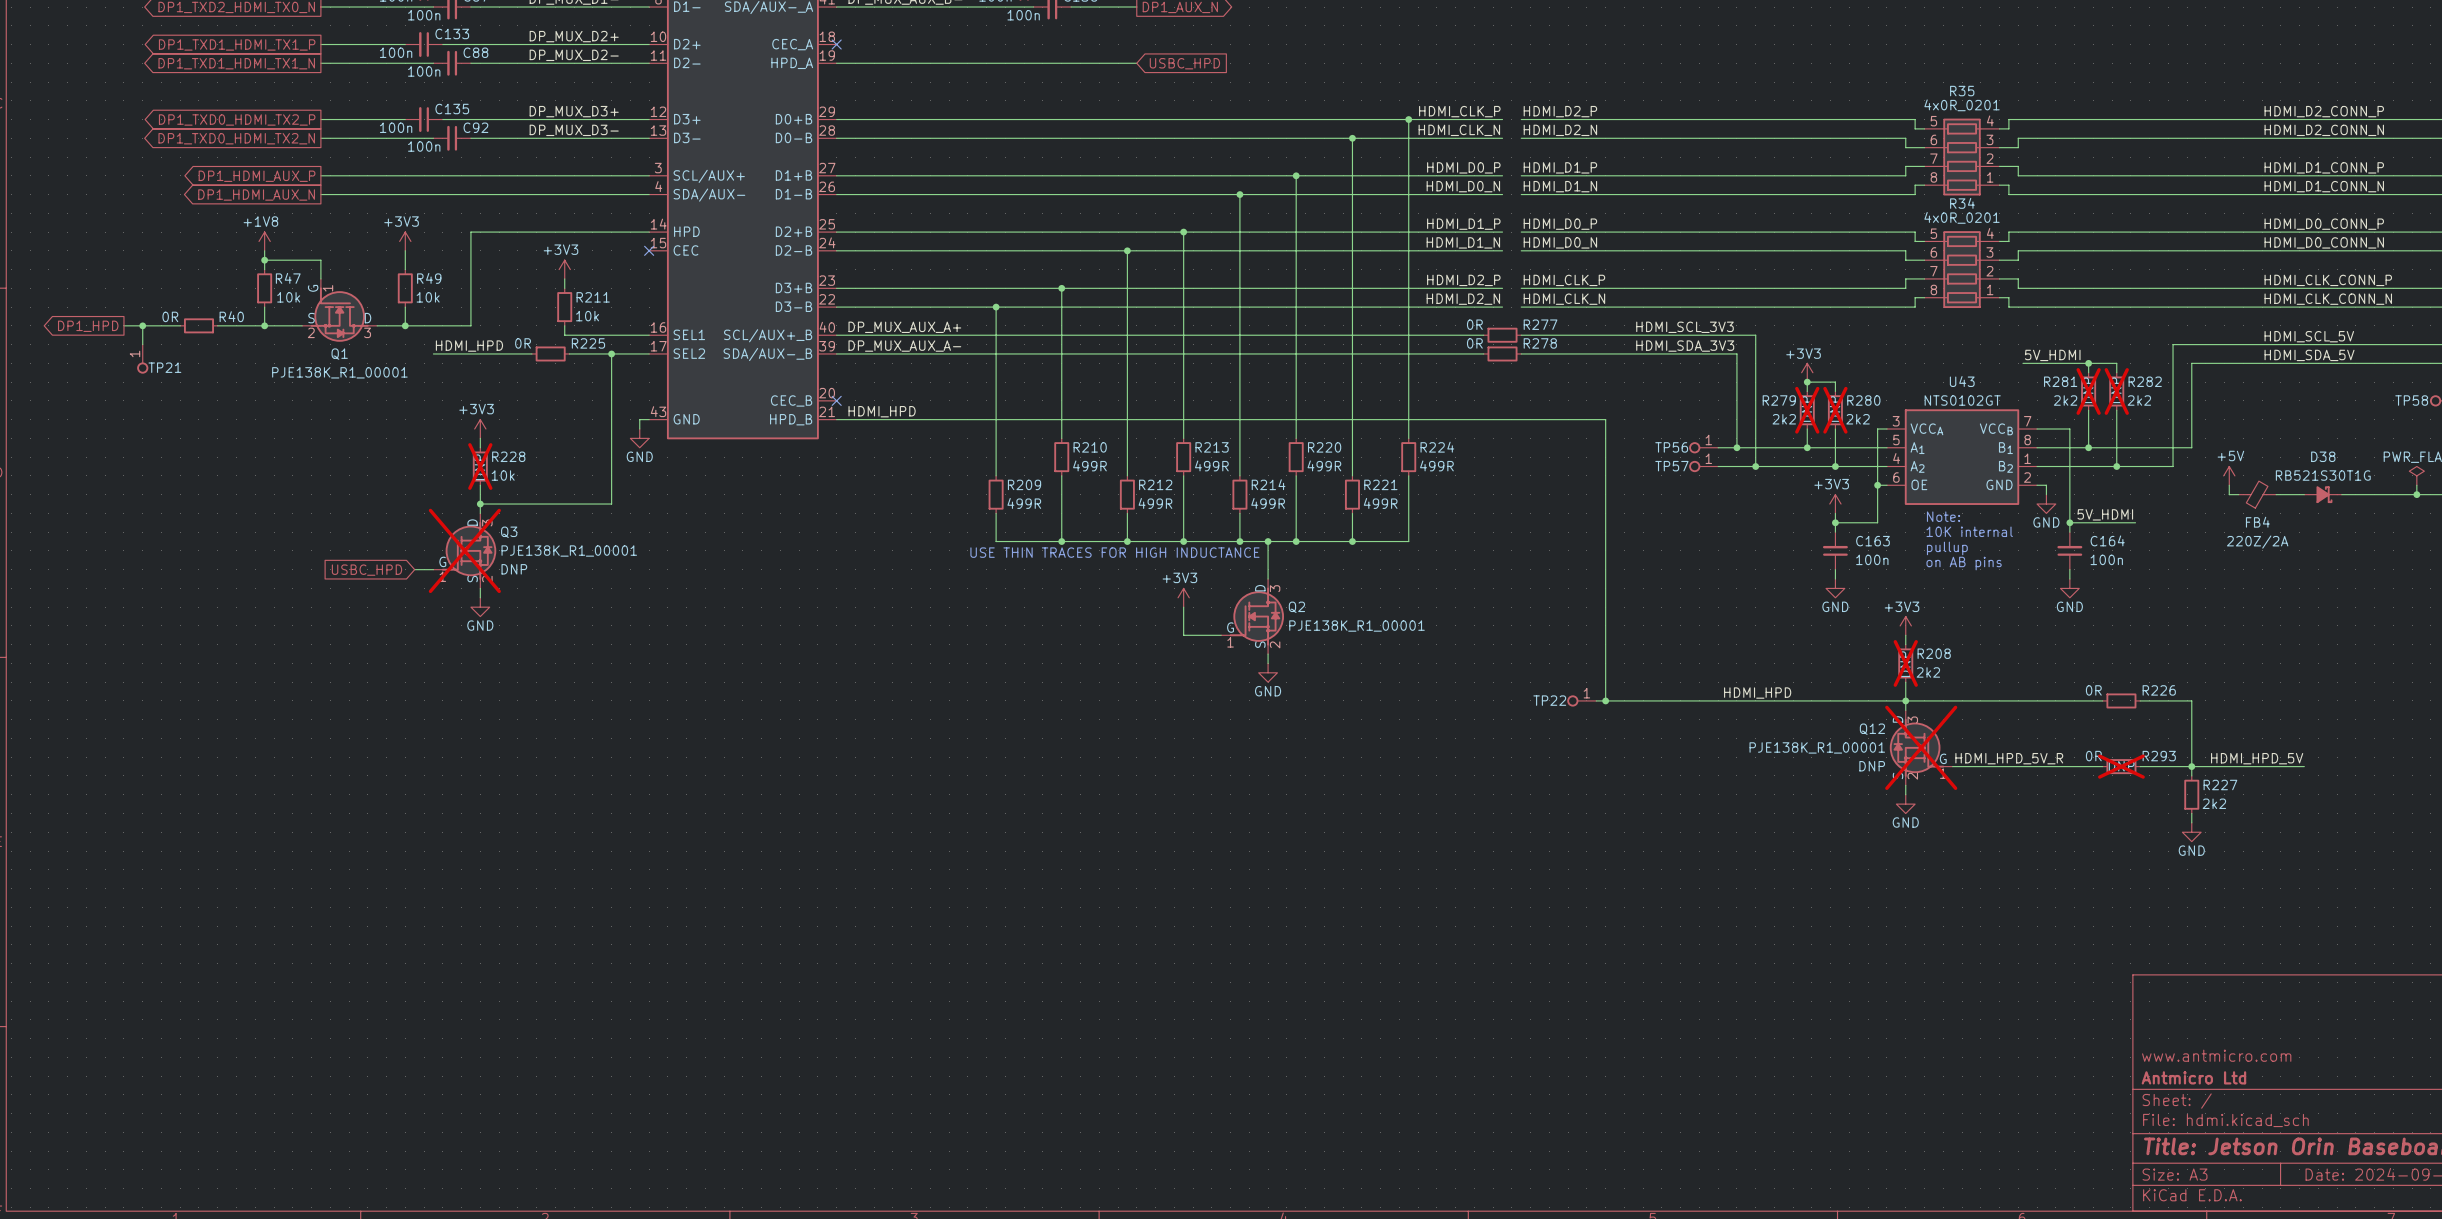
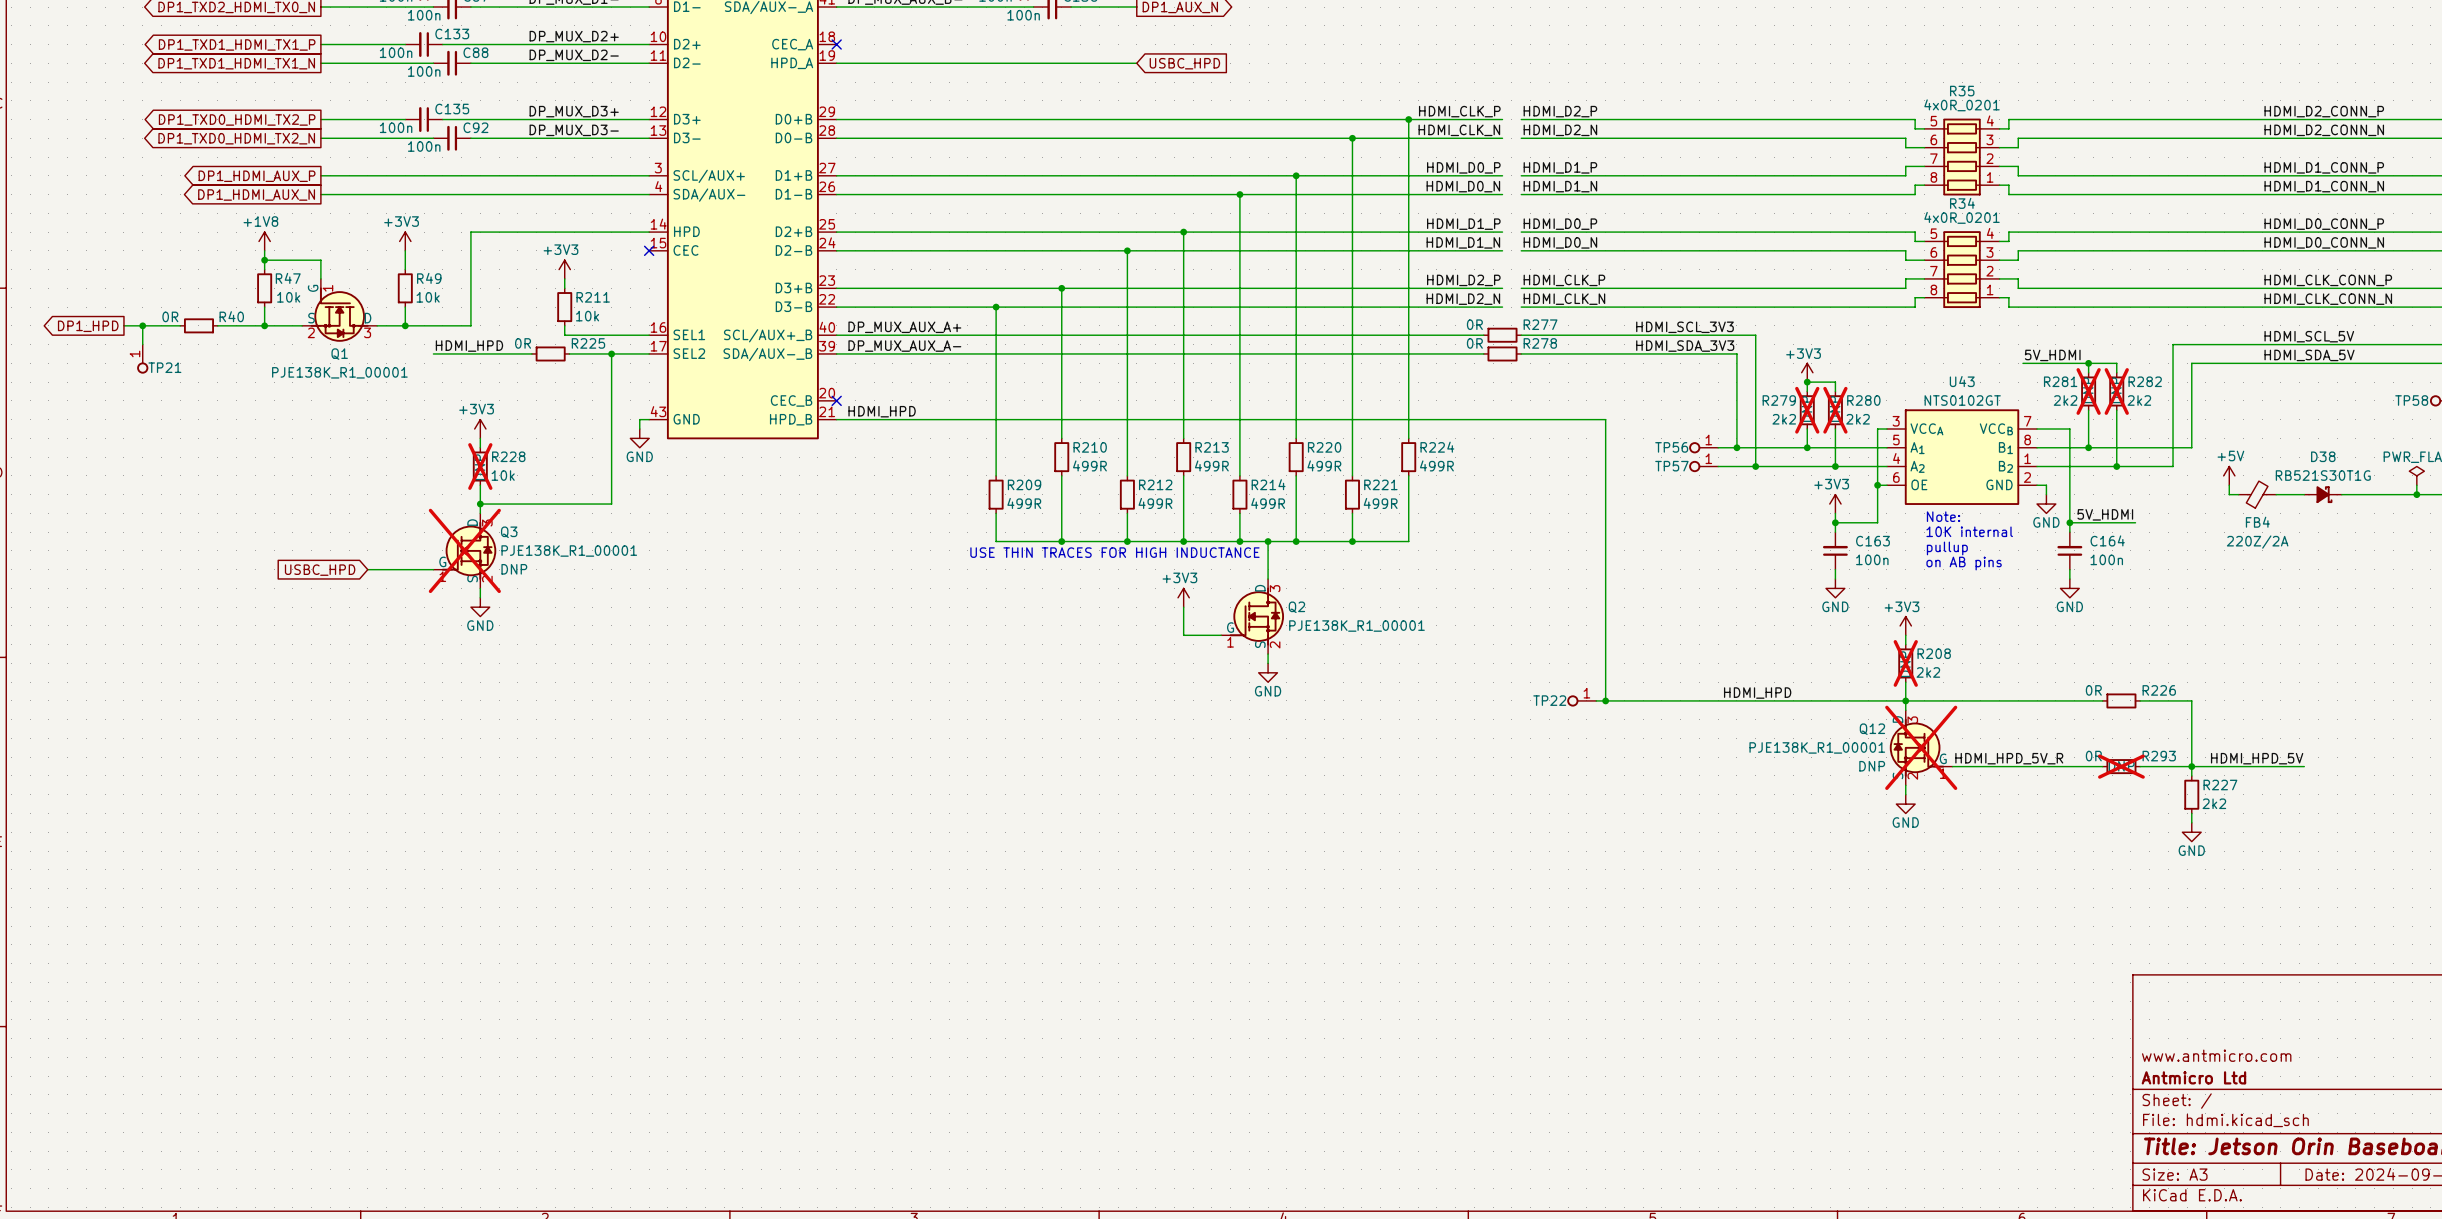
wire: none -> (367, 569) (414, 569)
global label position: USBC_HPD (366, 570) -> USBC_HPD (320, 570)

